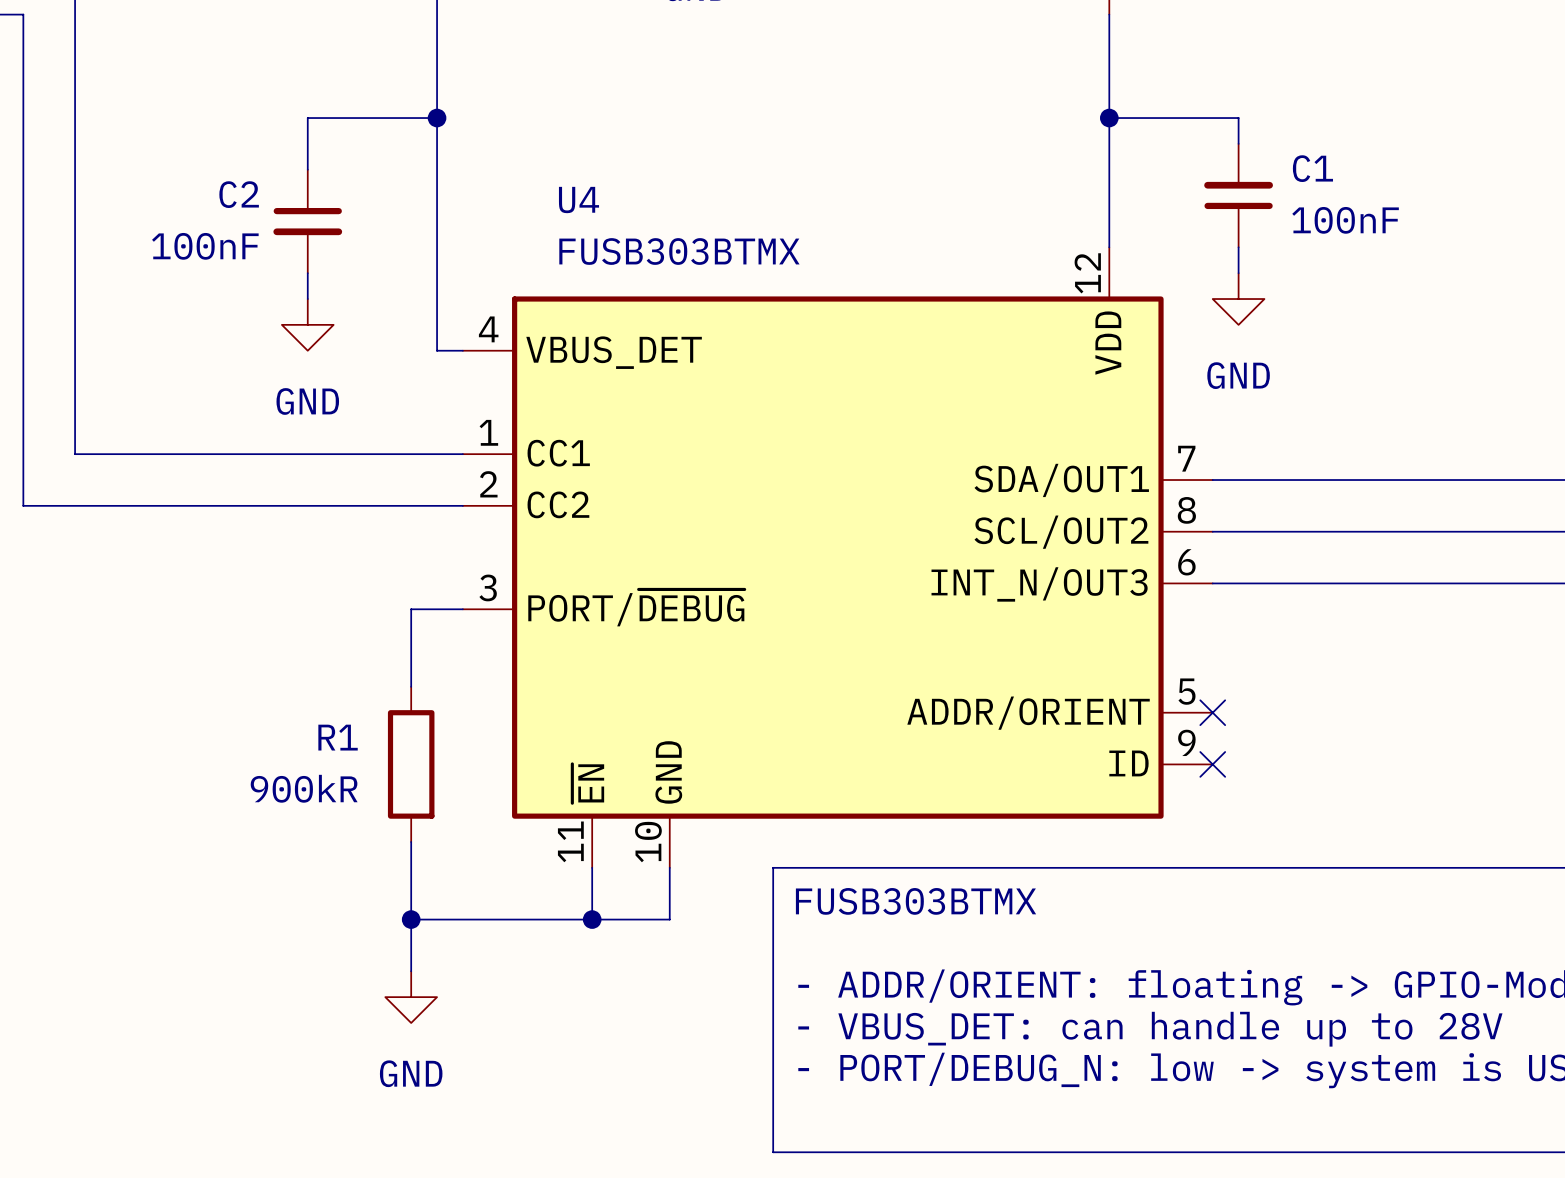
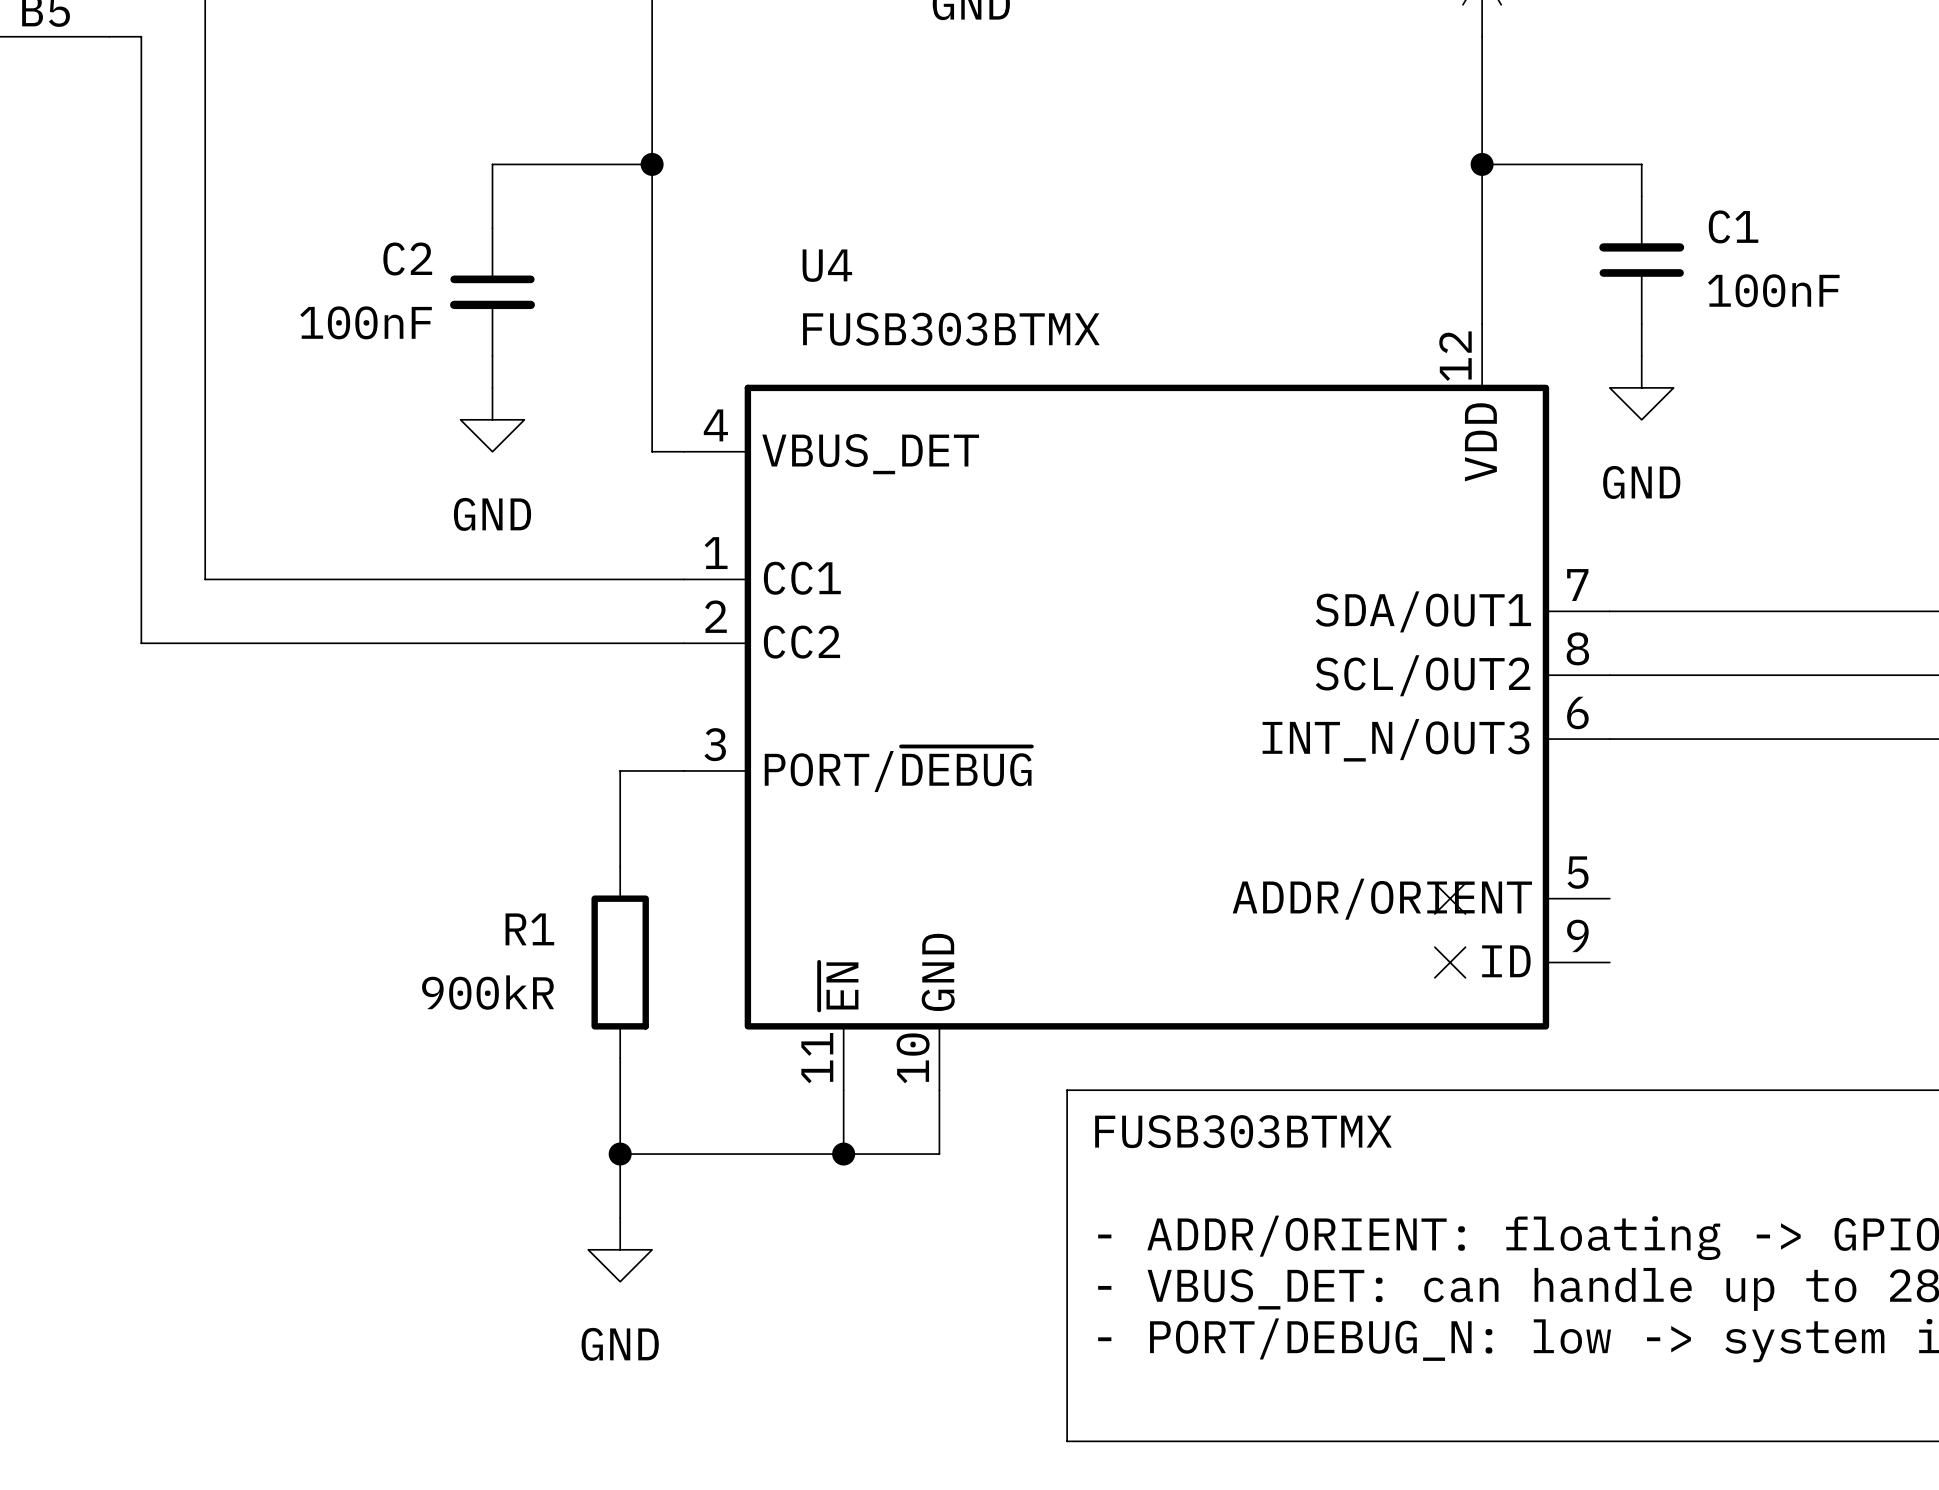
no-connect mark: none -> (1450, 898)
no-connect mark: (1212, 712) -> none
no-connect mark: none -> (1450, 962)
no-connect mark: (1212, 764) -> none

